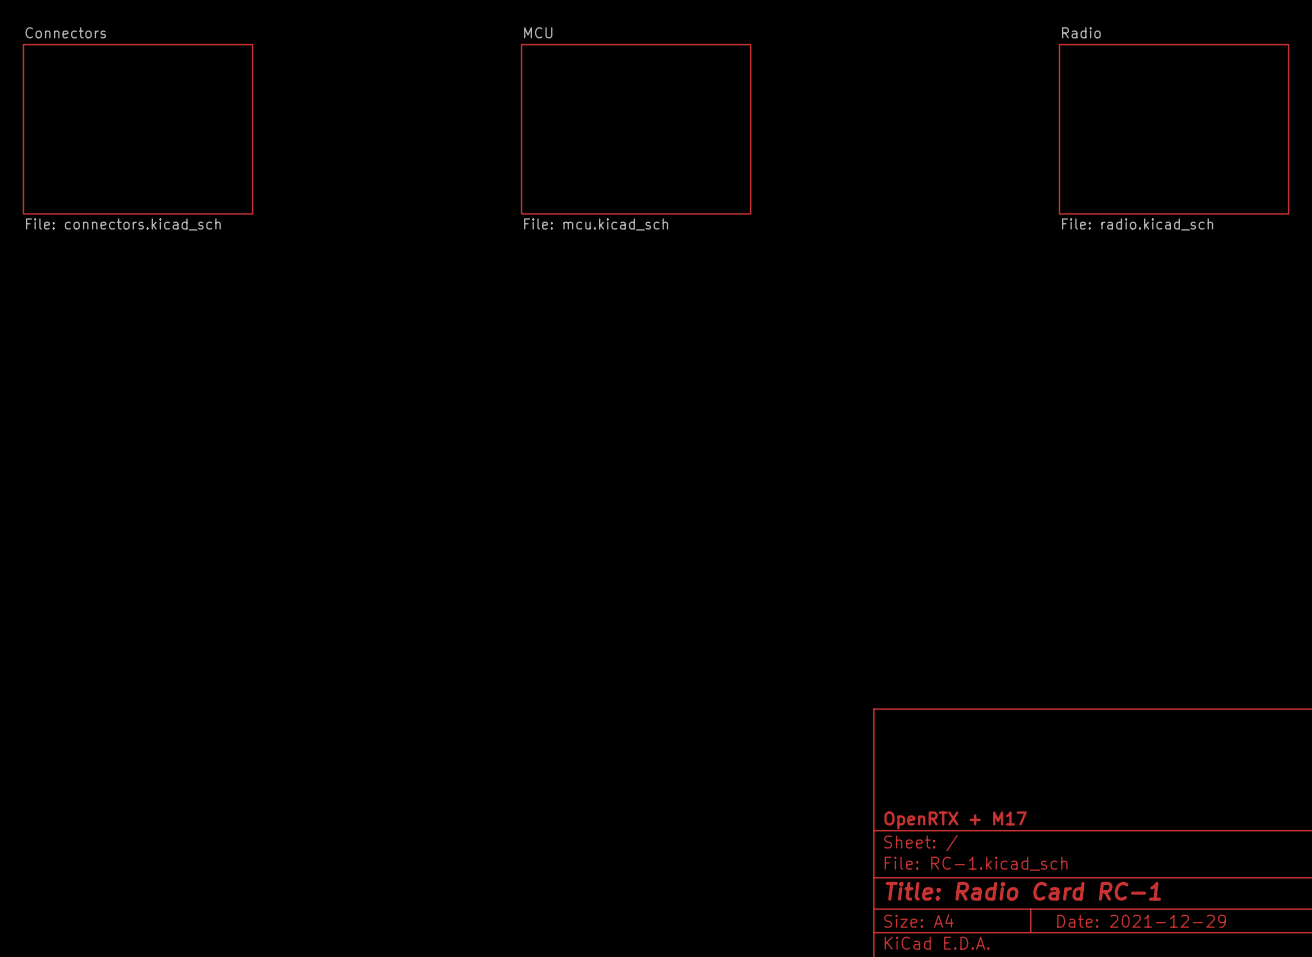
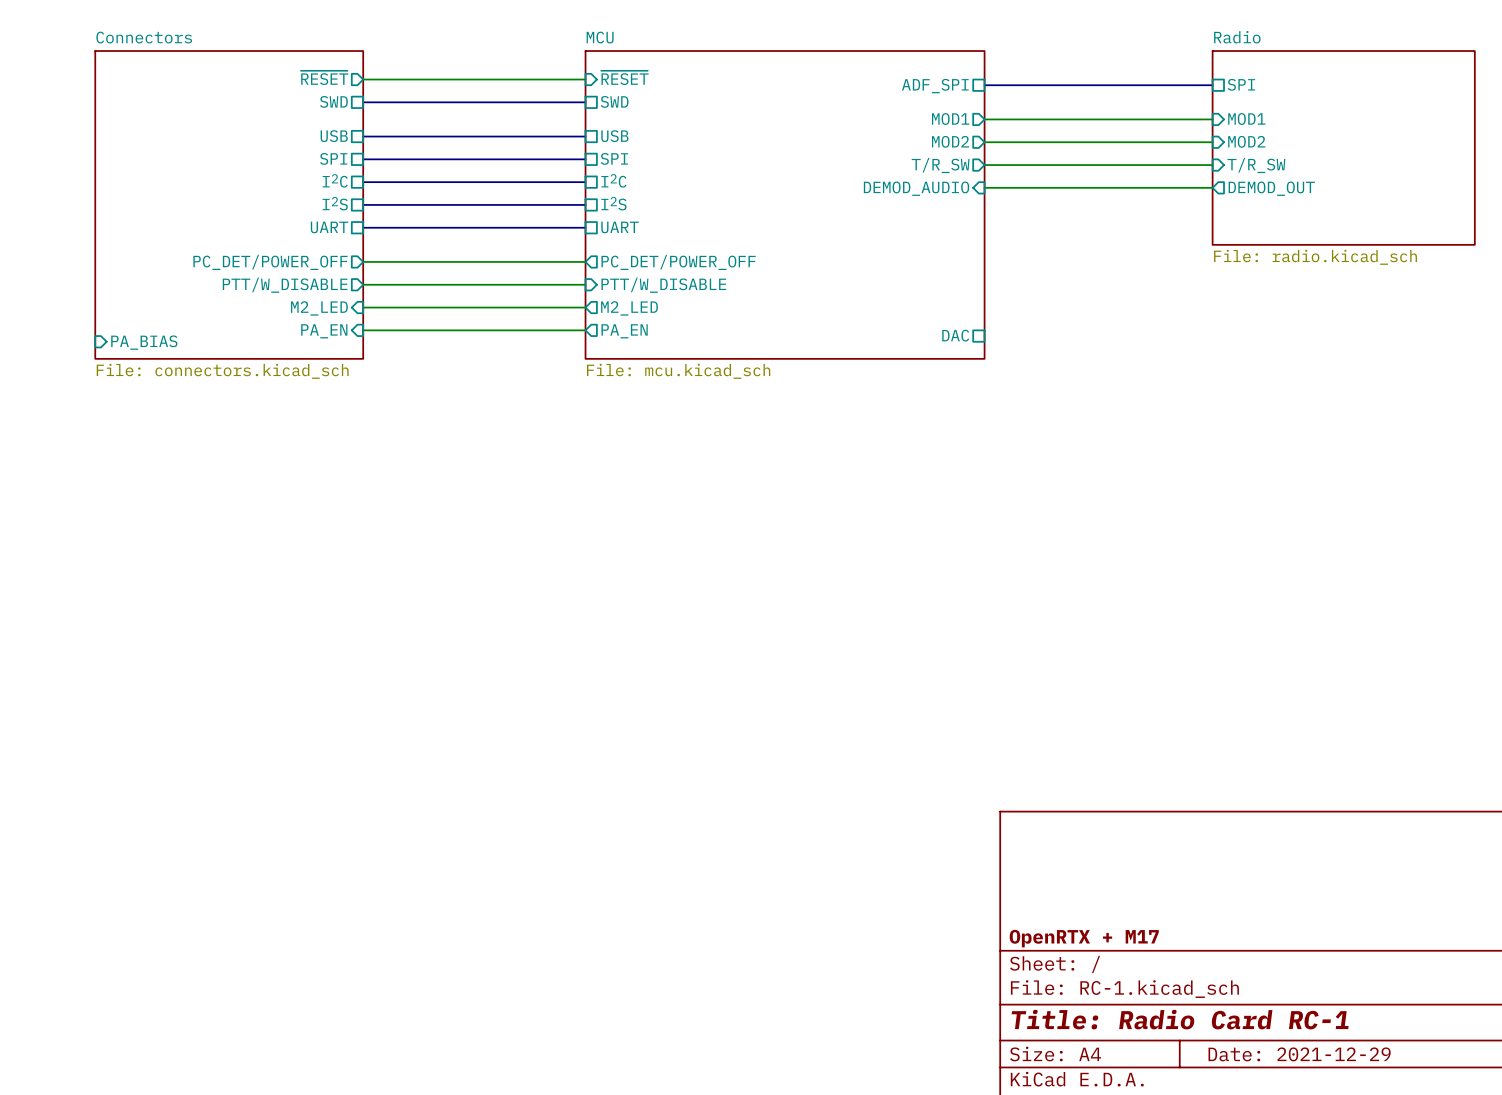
sheet pin: none -> ~{RESET} (324, 77)
sheet pin: none -> ~{RESET} (624, 77)
wire: none -> (363, 79) (585, 79)
sheet pin: none -> ADF_SPI (935, 86)
bus: none -> (984, 85) (1212, 85)
sheet pin: none -> SPI (1241, 84)
sheet pin: none -> SWD (333, 101)
bus: none -> (363, 102) (585, 102)
sheet pin: none -> SWD (614, 101)
sheet pin: none -> MOD1 (950, 119)
sheet pin: none -> MOD1 (1246, 119)
wire: none -> (984, 119) (1212, 119)
sheet pin: none -> USB (334, 136)
sheet pin: none -> USB (614, 136)
bus: none -> (363, 136) (585, 136)
sheet pin: none -> MOD2 (950, 141)
sheet pin: none -> MOD2 (1246, 141)
wire: none -> (984, 142) (1212, 142)
sheet Connectors: File: connectors.kicad_sch (138, 129) -> none
sheet MCU: File: mcu.kicad_sch (636, 129) -> none
sheet pin: none -> SPI (333, 158)
sheet pin: none -> SPI (614, 158)
bus: none -> (363, 159) (585, 159)
sheet pin: none -> T/R_SW (940, 165)
wire: none -> (984, 165) (1212, 165)
sheet pin: none -> T/R_SW (1256, 165)
sheet pin: none -> I2C (335, 180)
sheet pin: none -> I2C (613, 180)
bus: none -> (363, 182) (585, 182)
sheet pin: none -> DEMOD_AUDIO (916, 188)
wire: none -> (984, 187) (1212, 187)
sheet pin: none -> DEMOD_OUT (1271, 188)
sheet pin: none -> I2S (335, 203)
sheet pin: none -> I2S (613, 203)
sheet Connectors: none -> File: connectors.kicad_sch (229, 204)
bus: none -> (363, 204) (585, 204)
sheet MCU: none -> File: mcu.kicad_sch (785, 204)
sheet pin: none -> UART (329, 227)
bus: none -> (363, 227) (585, 227)
sheet pin: none -> UART (620, 227)
wire: none -> (363, 261) (585, 261)
sheet pin: none -> PC_DET/POWER_OFF (270, 262)
sheet pin: none -> PC_DET/POWER_OFF (678, 262)
wire: none -> (363, 284) (585, 284)
sheet pin: none -> PTT/W_DISABLE (285, 285)
sheet pin: none -> PTT/W_DISABLE (663, 285)
sheet pin: none -> M2_LED (319, 308)
wire: none -> (363, 307) (585, 307)
sheet pin: none -> M2_LED (629, 308)
sheet pin: none -> PA_EN (324, 331)
wire: none -> (363, 330) (585, 330)
sheet pin: none -> PA_EN (624, 331)
sheet pin: none -> DAC (955, 335)
sheet pin: none -> PA_BIAS (144, 342)

